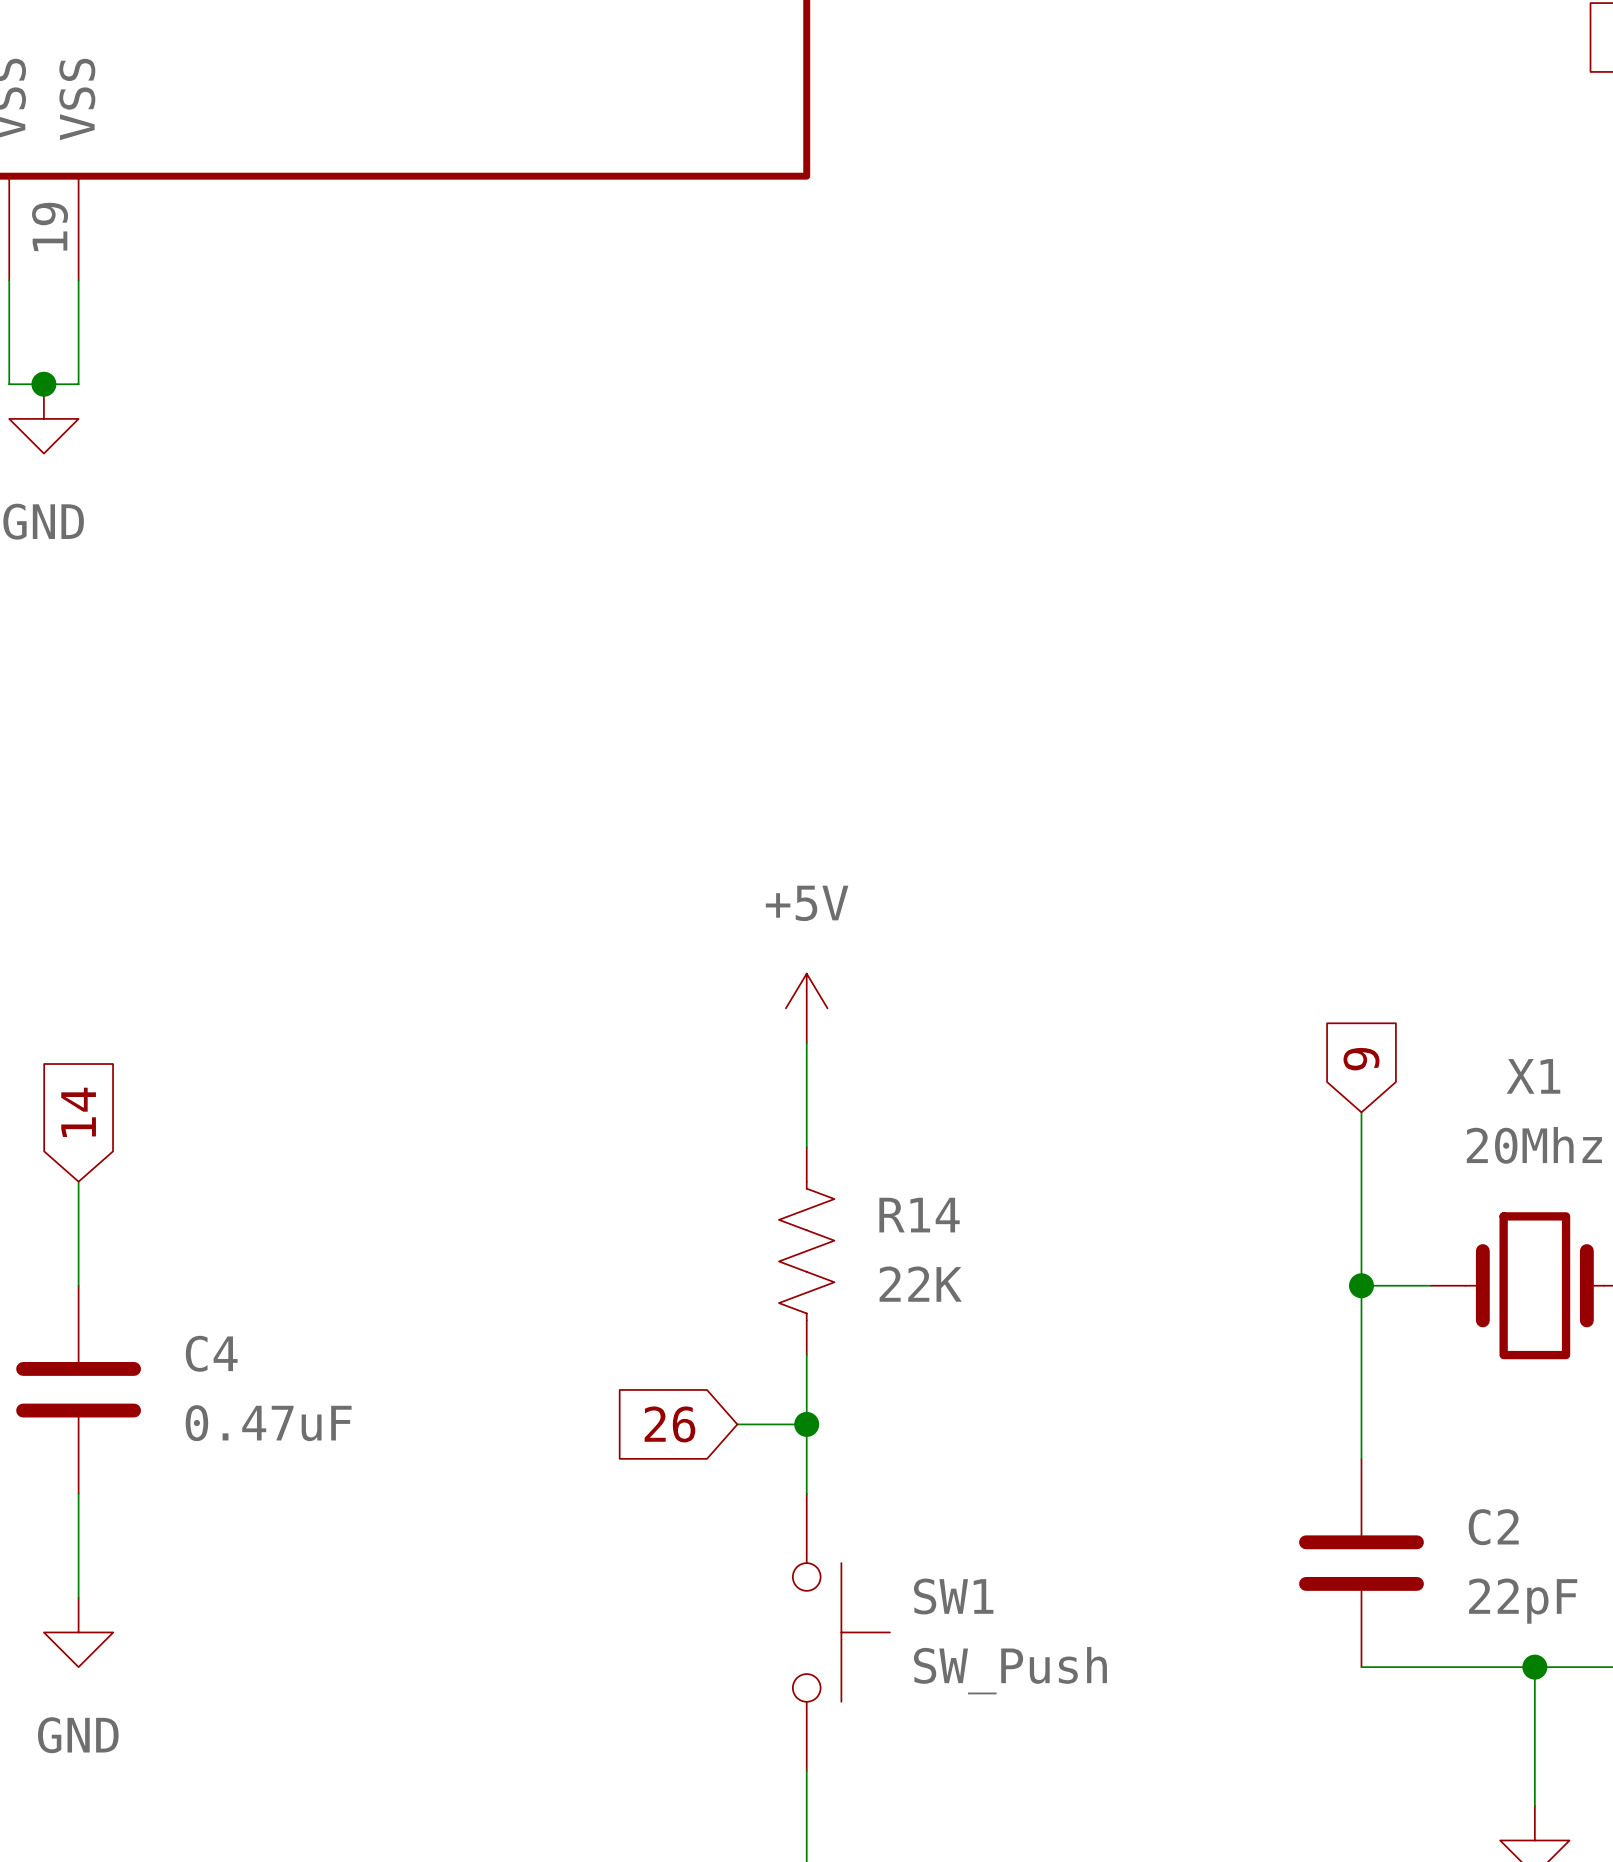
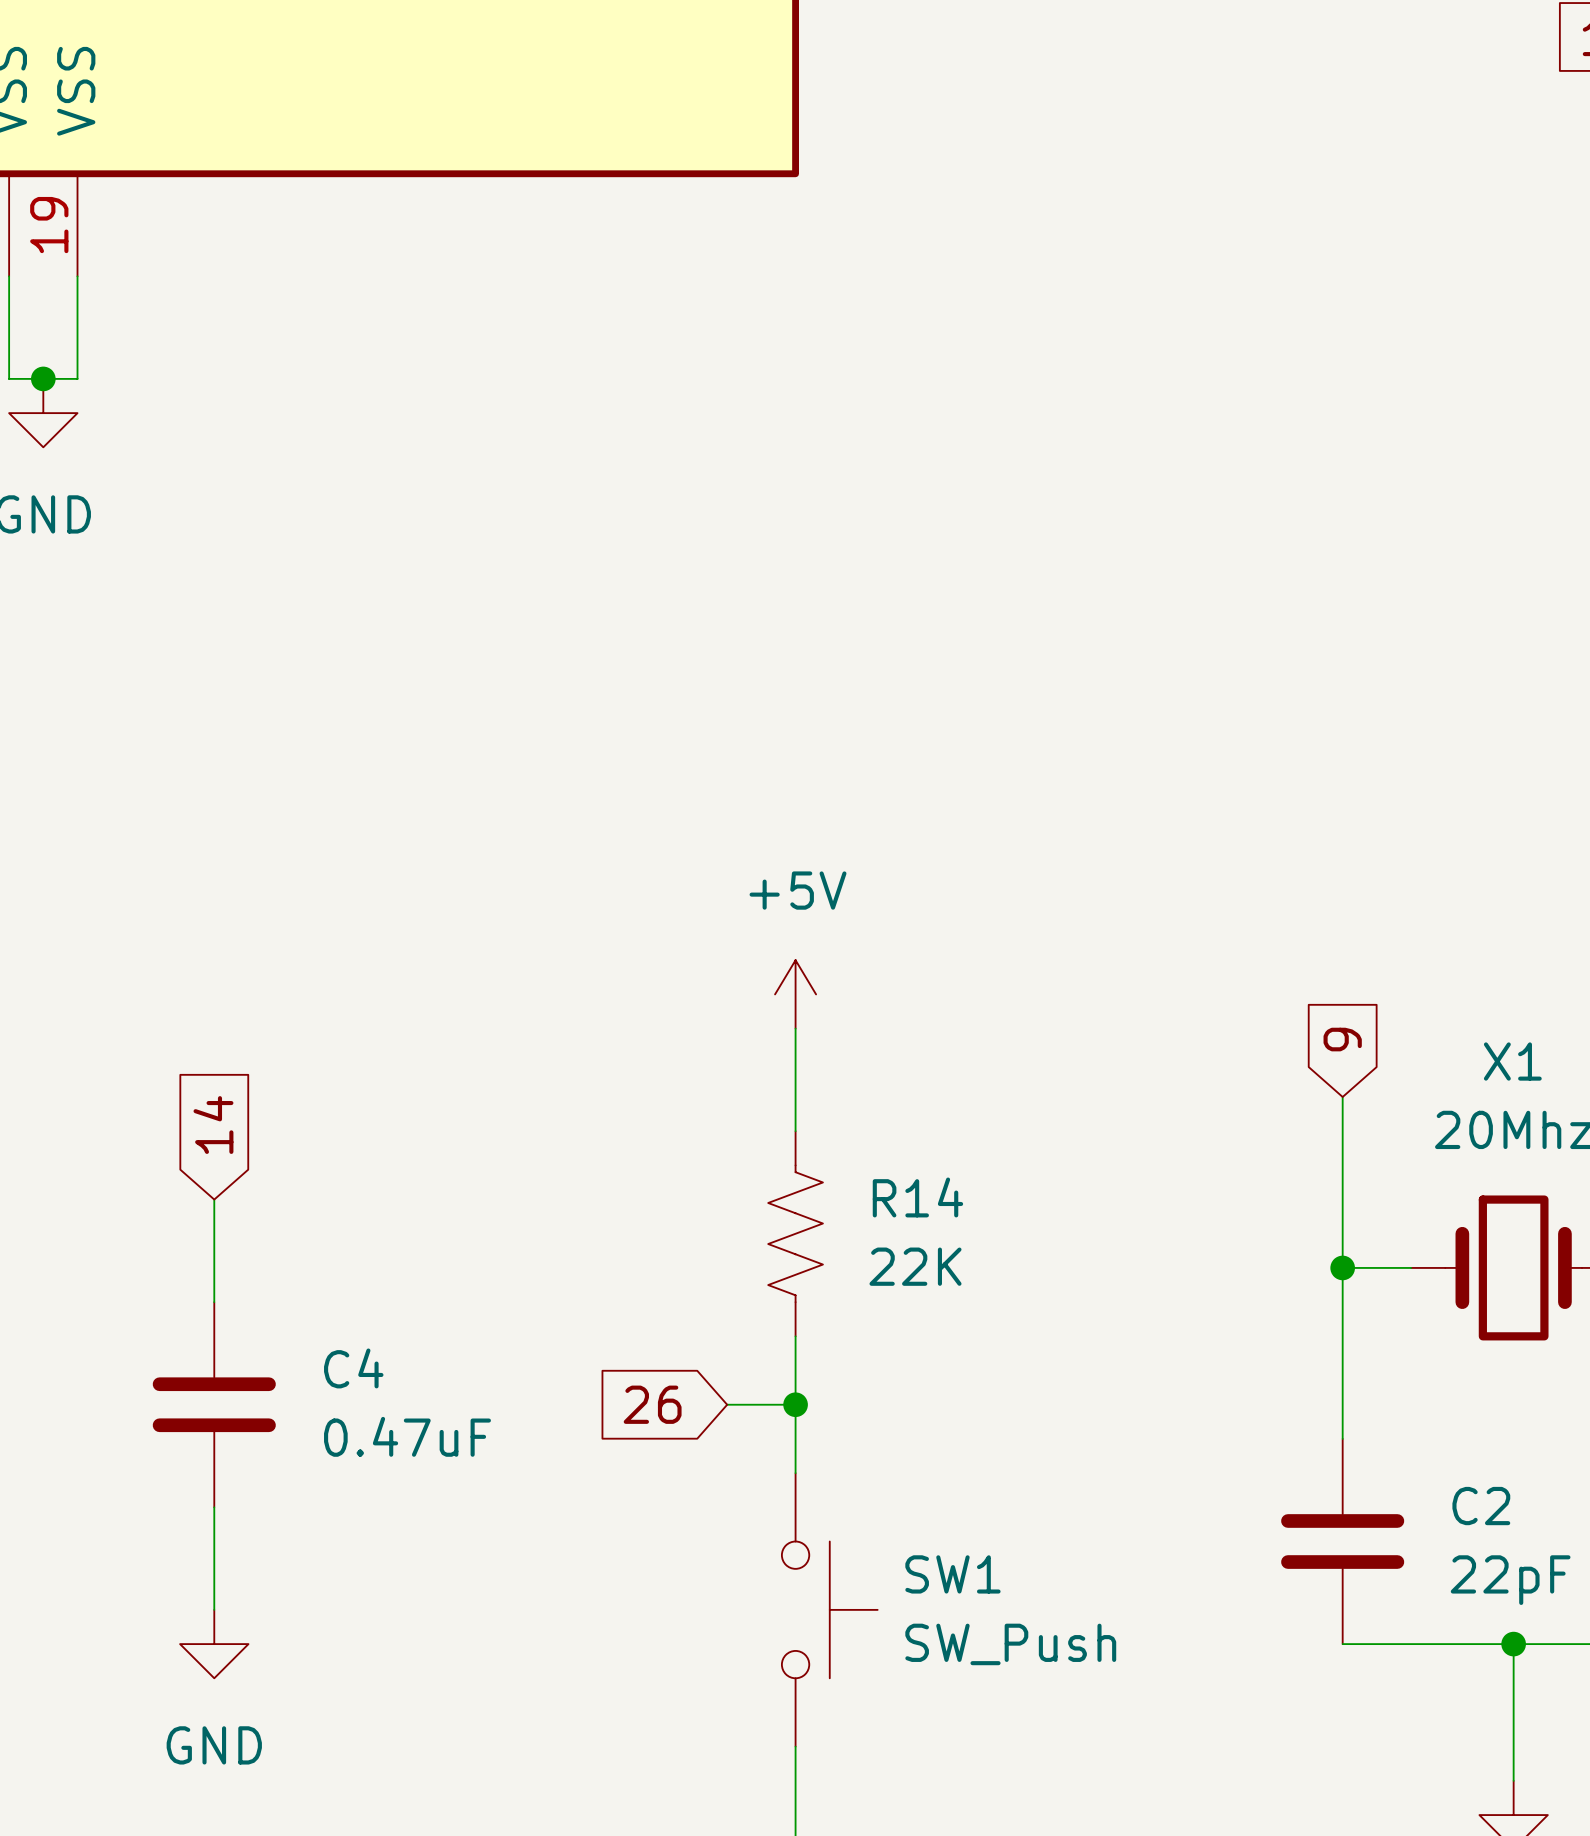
global label position: 14 (78, 1112) -> 14 (213, 1125)
wire: (78, 1181) (78, 1285) -> (214, 1199) (214, 1302)
C4 position: (78, 1389) -> (214, 1404)
wire: (78, 1493) (78, 1597) -> (214, 1507) (214, 1609)
power symbol position: GND (78, 1632) -> GND (214, 1644)

